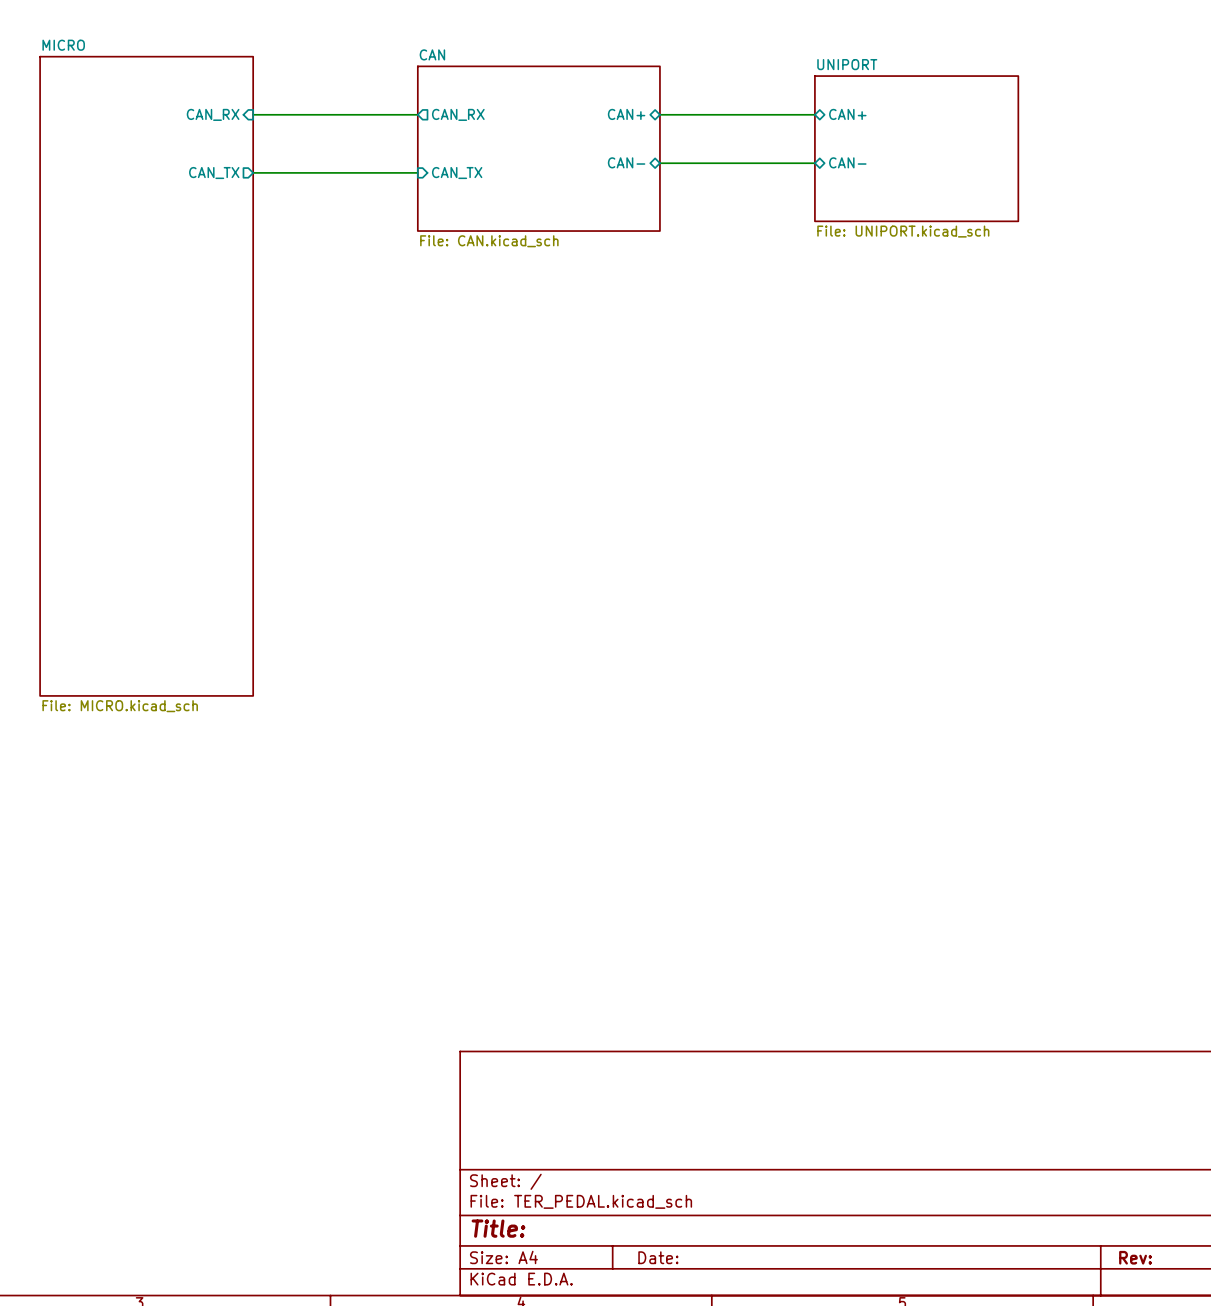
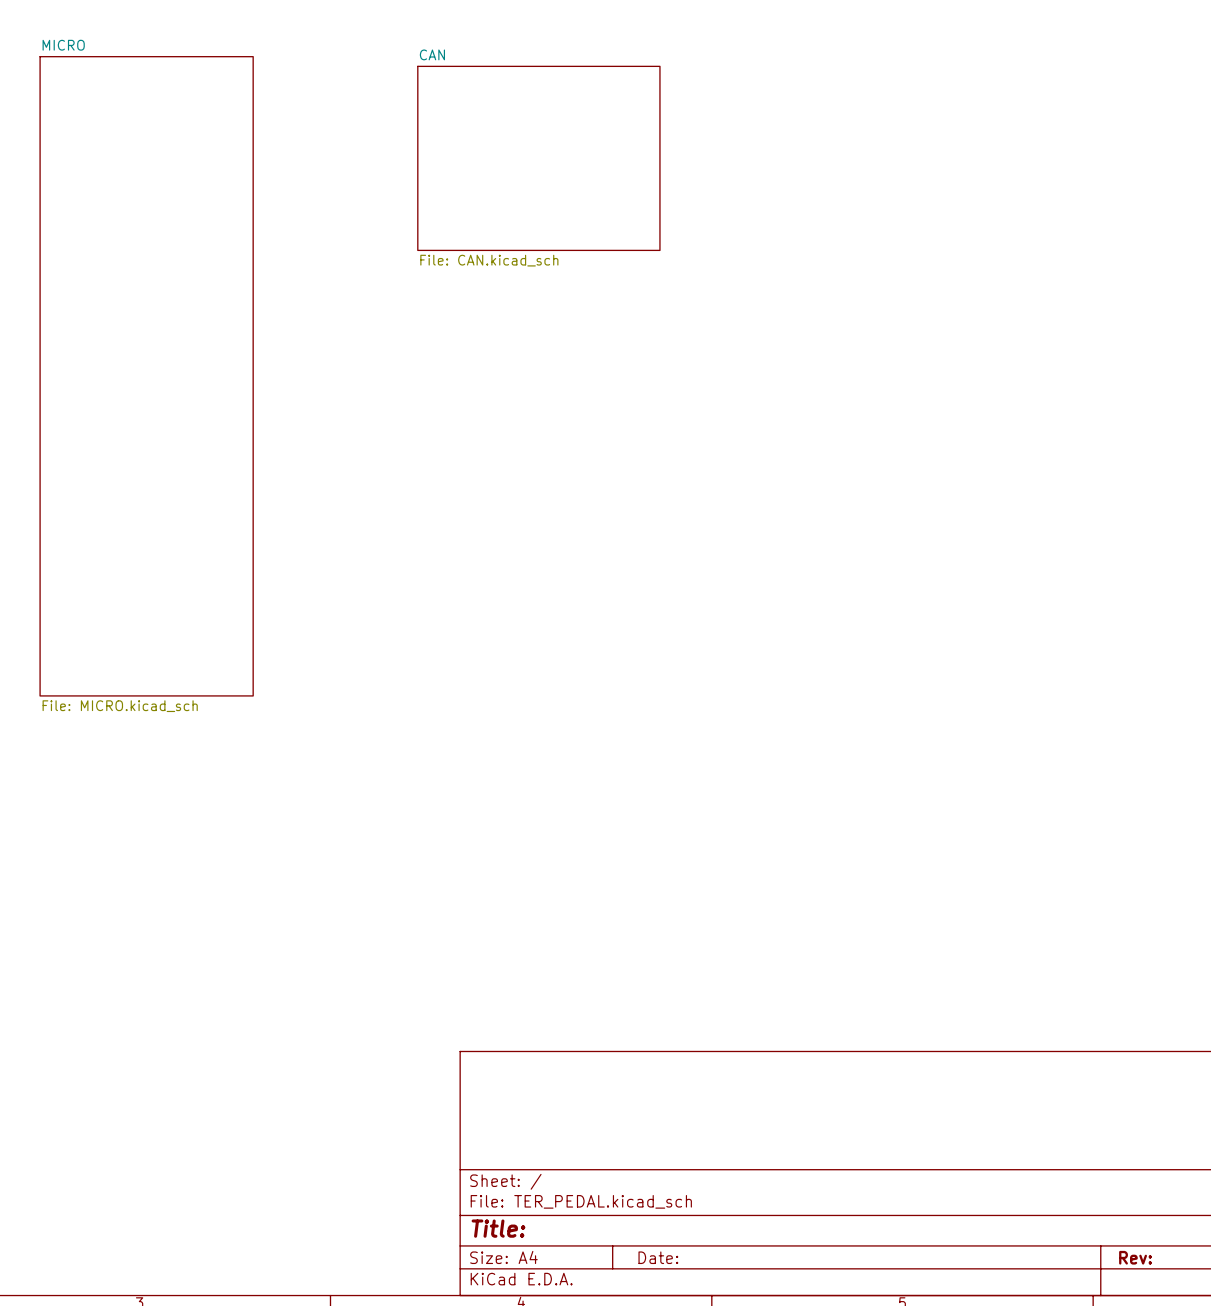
sheet pin: CAN_RX (213, 114) -> none
wire: (253, 114) (417, 114) -> none
sheet pin: CAN_RX (458, 114) -> none
sheet pin: CAN+ (626, 114) -> none
wire: (659, 114) (814, 114) -> none
sheet pin: CAN+ (847, 114) -> none
sheet CAN: File: CAN.kicad_sch (538, 148) -> none
sheet UNIPORT: File: UNIPORT.kicad_sch (916, 148) -> none
sheet CAN: none -> File: CAN.kicad_sch (538, 158)
sheet pin: CAN- (626, 162) -> none
sheet pin: CAN- (847, 162) -> none
wire: (659, 163) (814, 163) -> none
wire: (253, 172) (417, 172) -> none
sheet pin: CAN_TX (214, 173) -> none
sheet pin: CAN_TX (457, 173) -> none

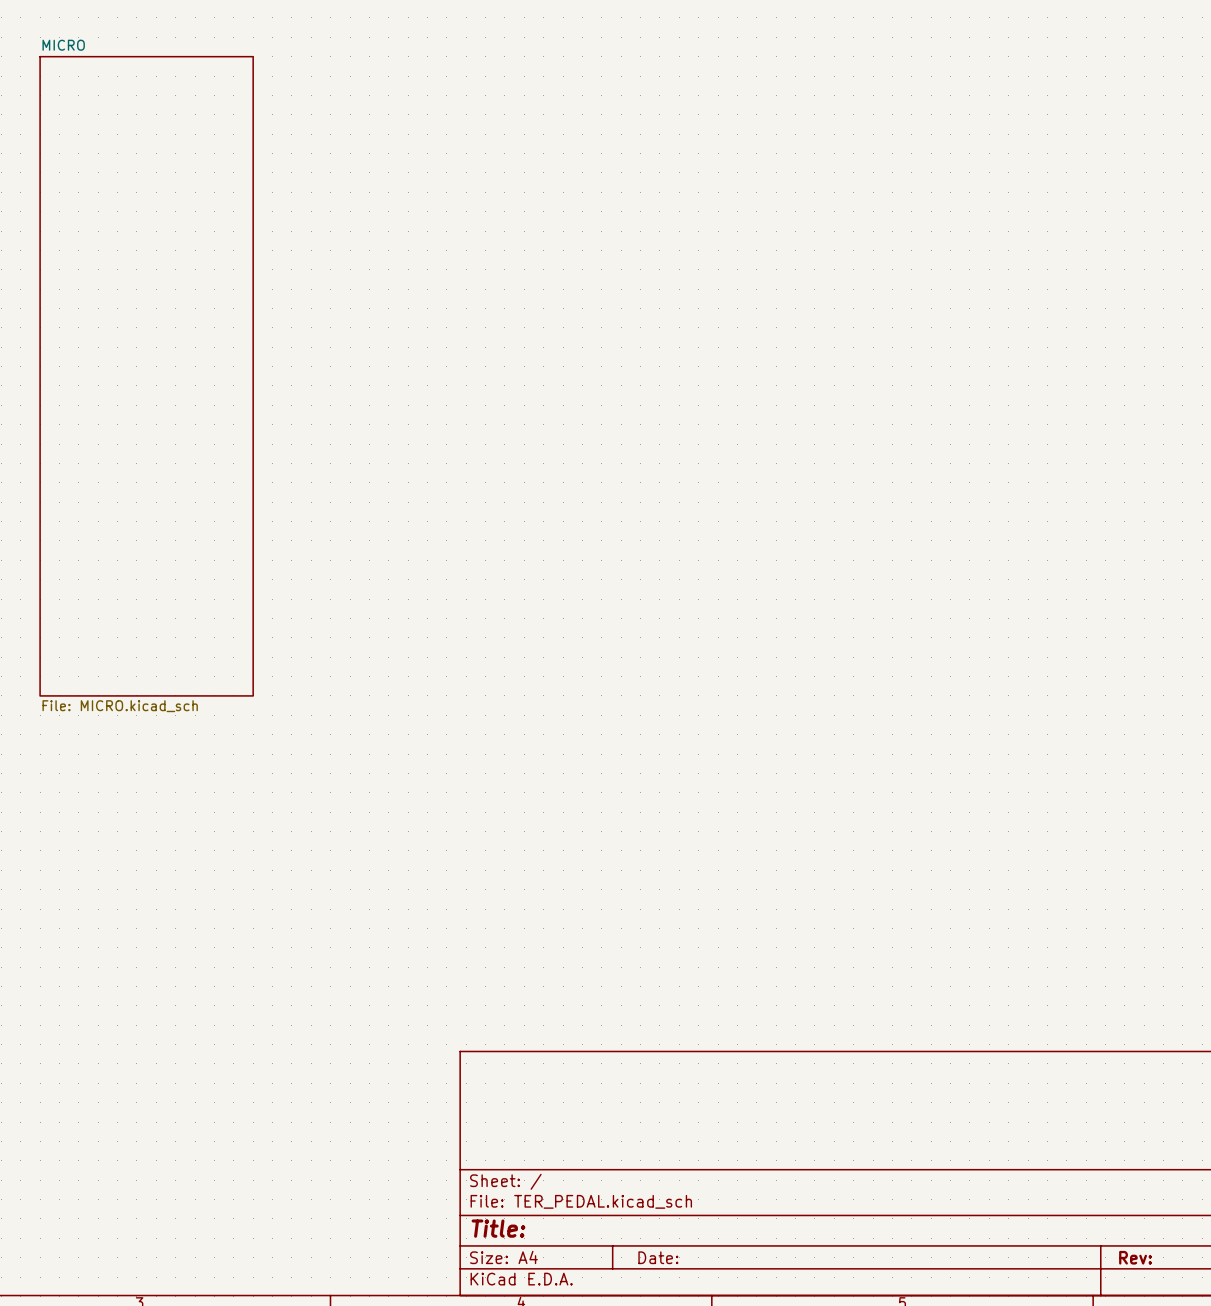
sheet CAN: File: CAN.kicad_sch (538, 158) -> none

